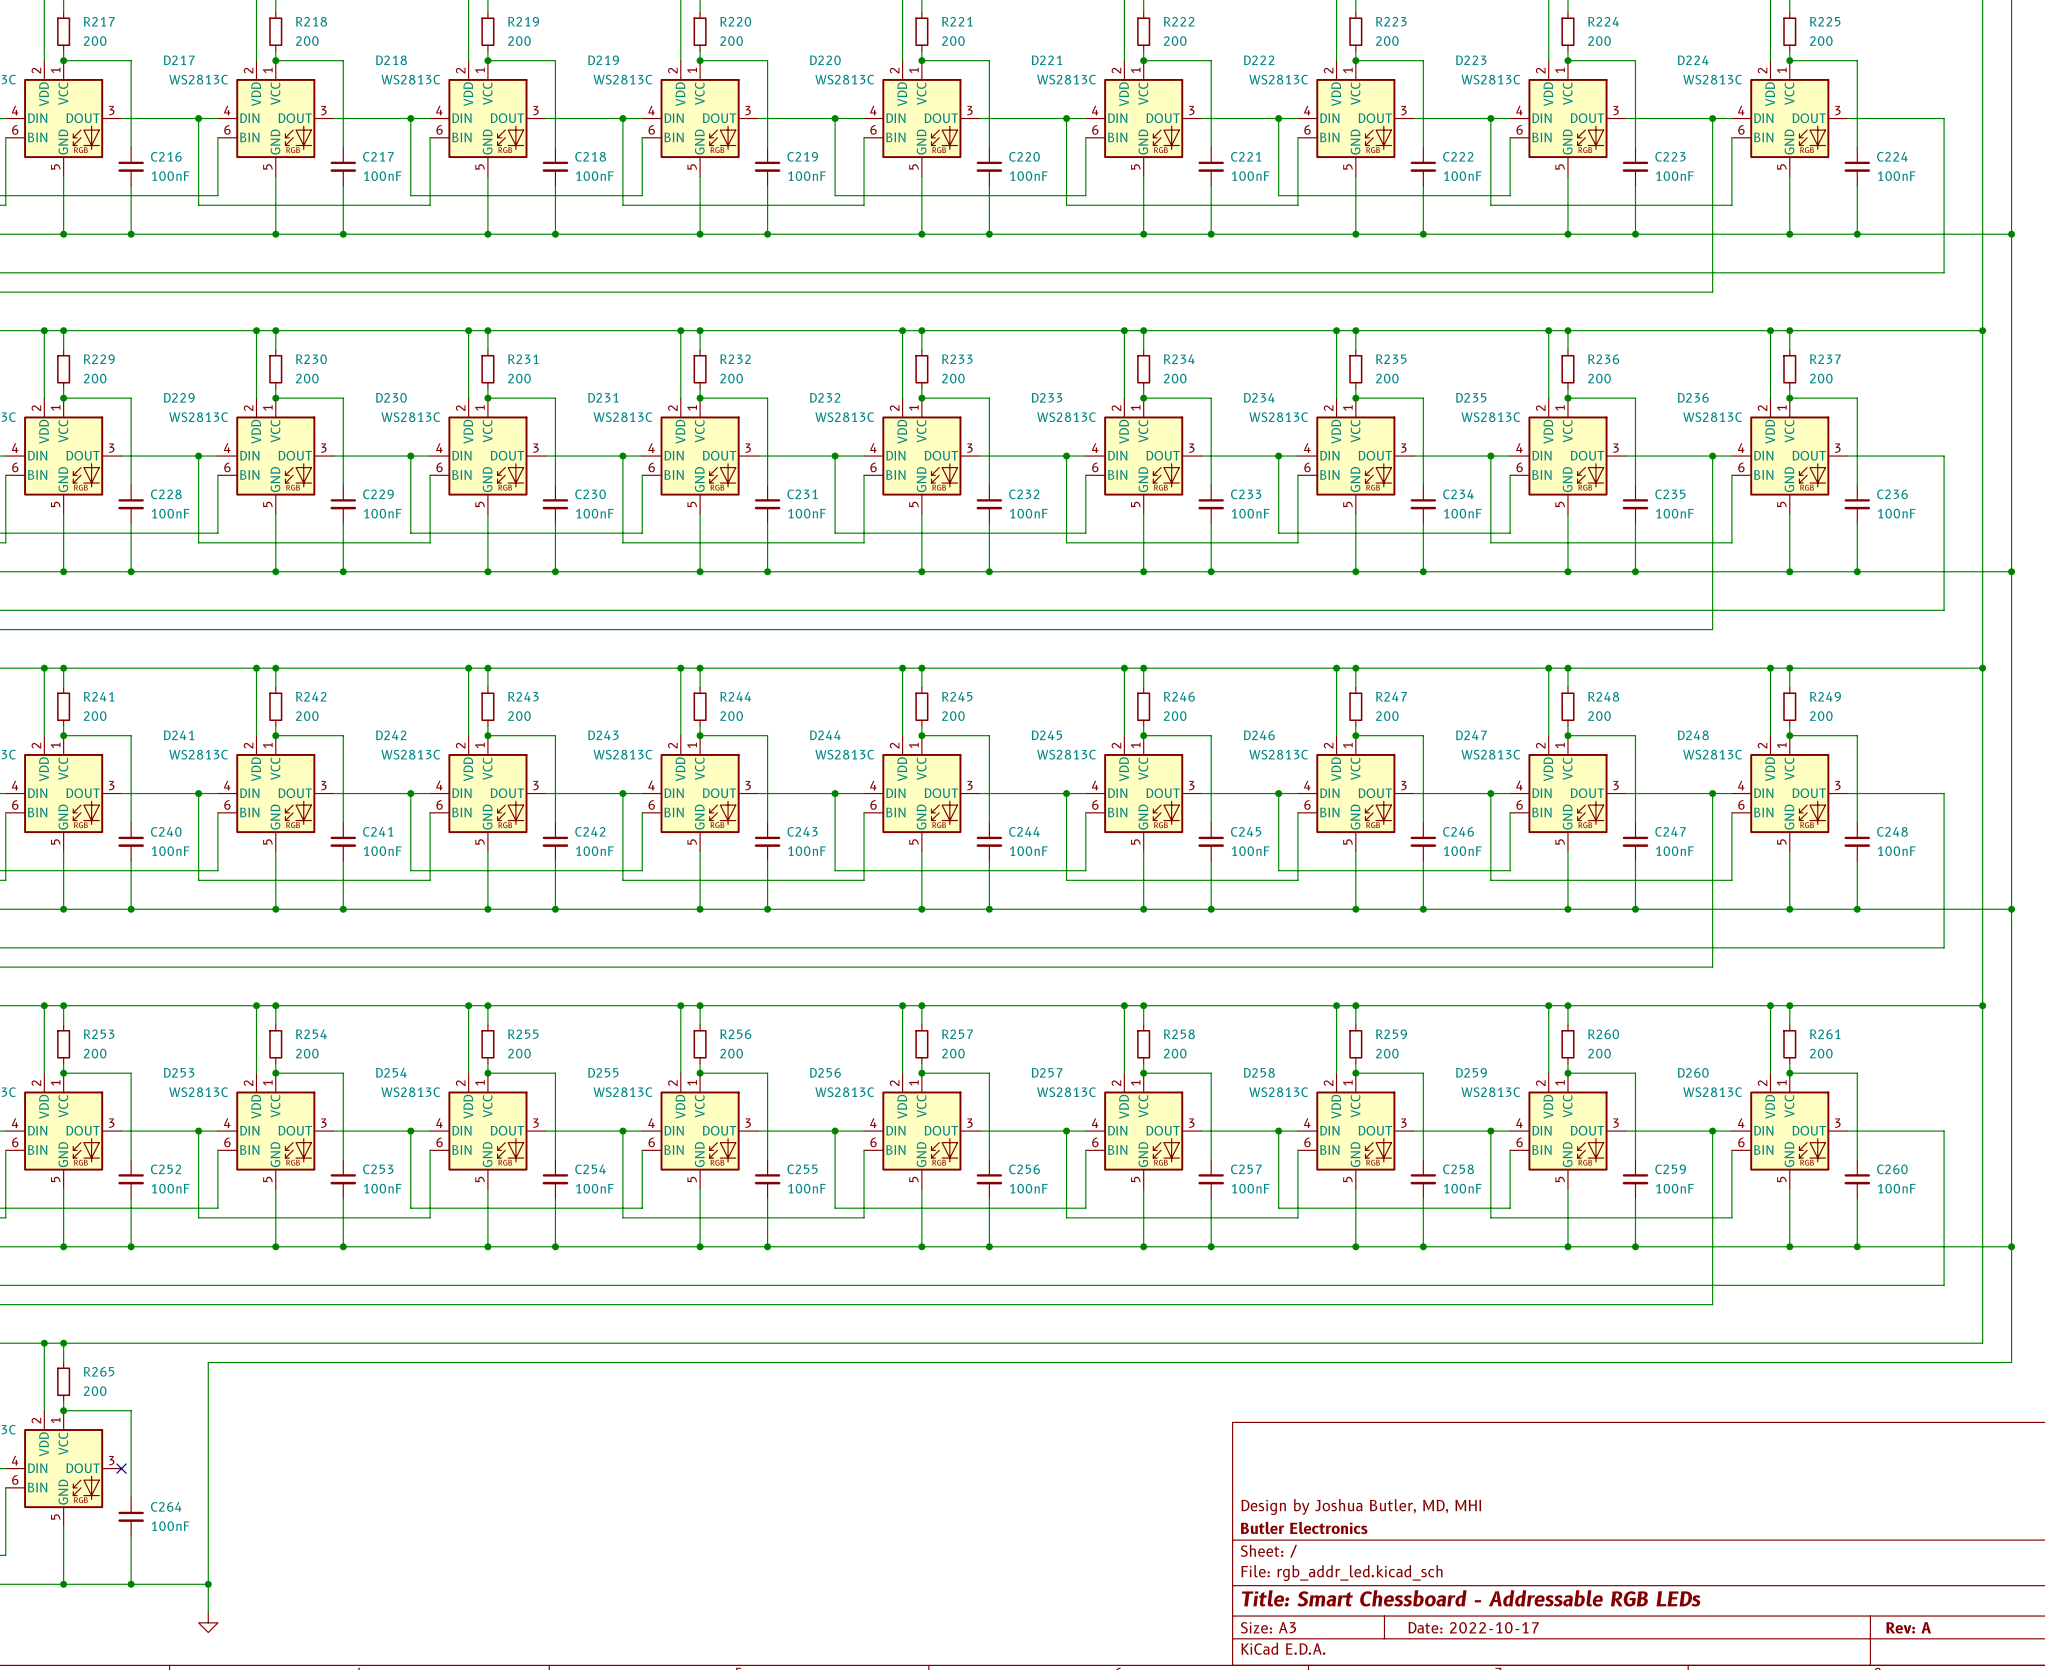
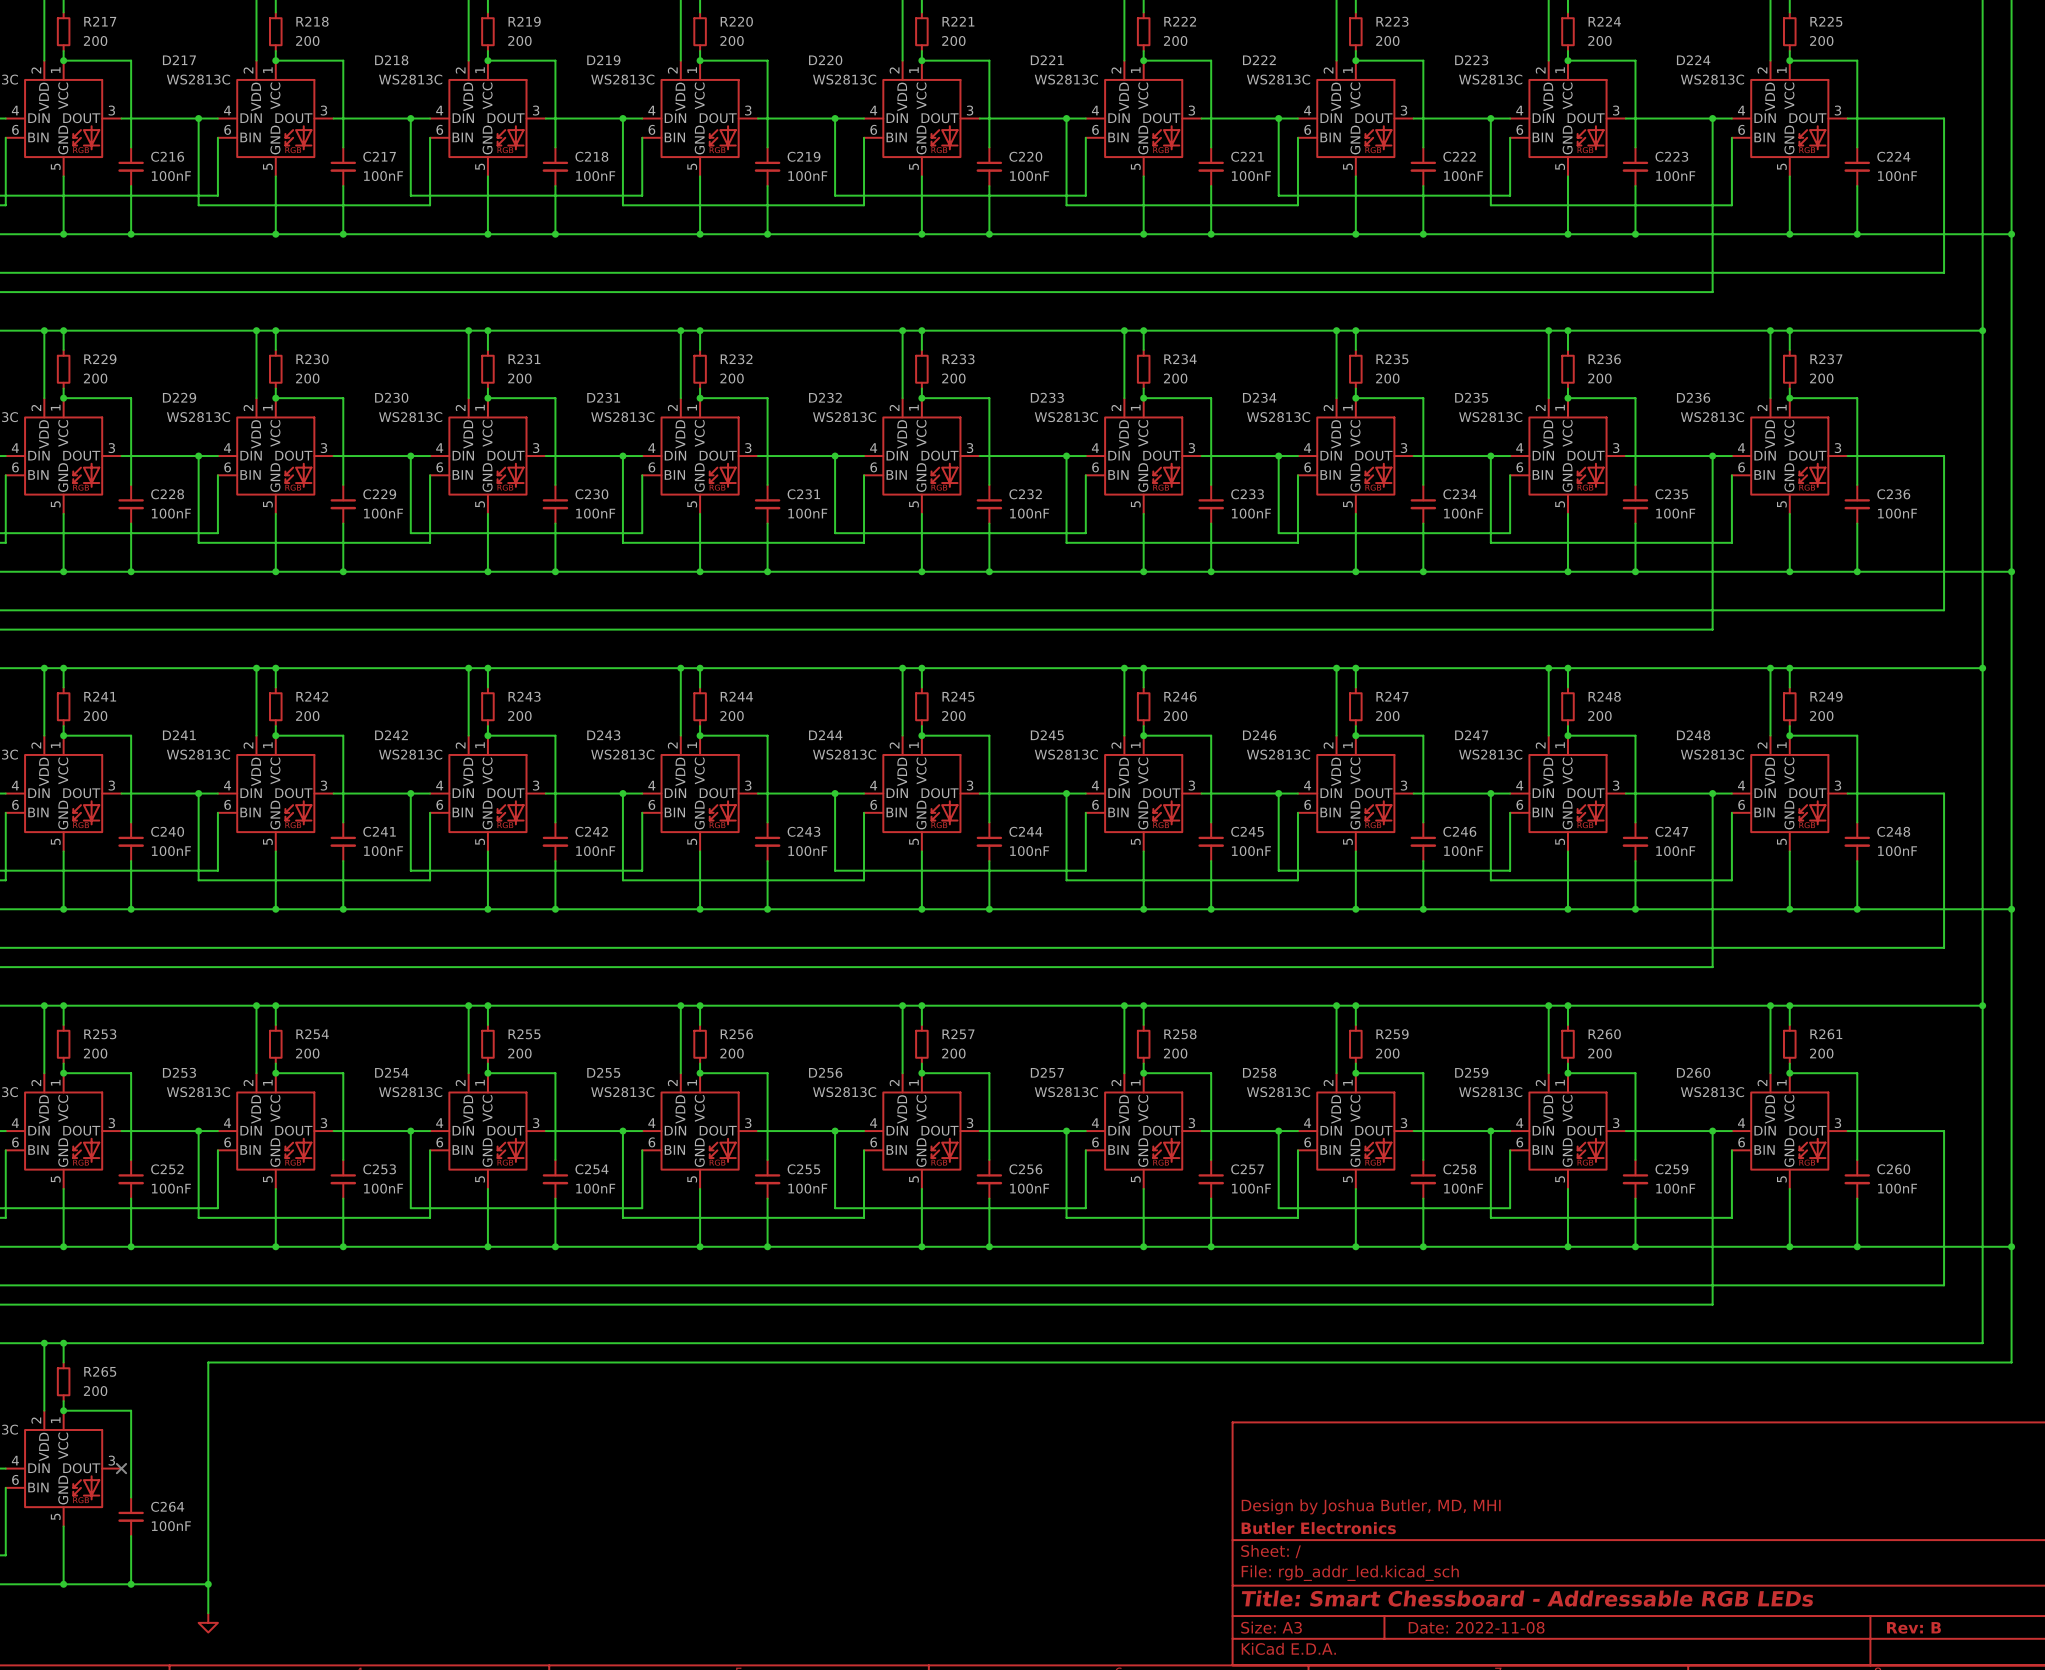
title block: Date: 2022-10-17 (1473, 1627) -> Date: 2022-11-08 (1476, 1627)
title block: Rev: A (1908, 1627) -> Rev: B (1913, 1627)

